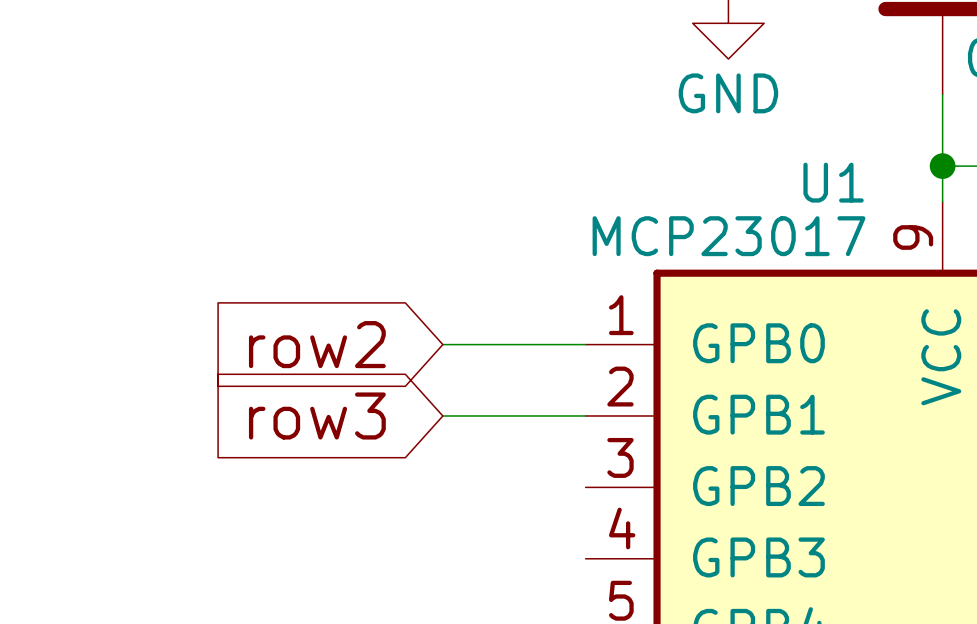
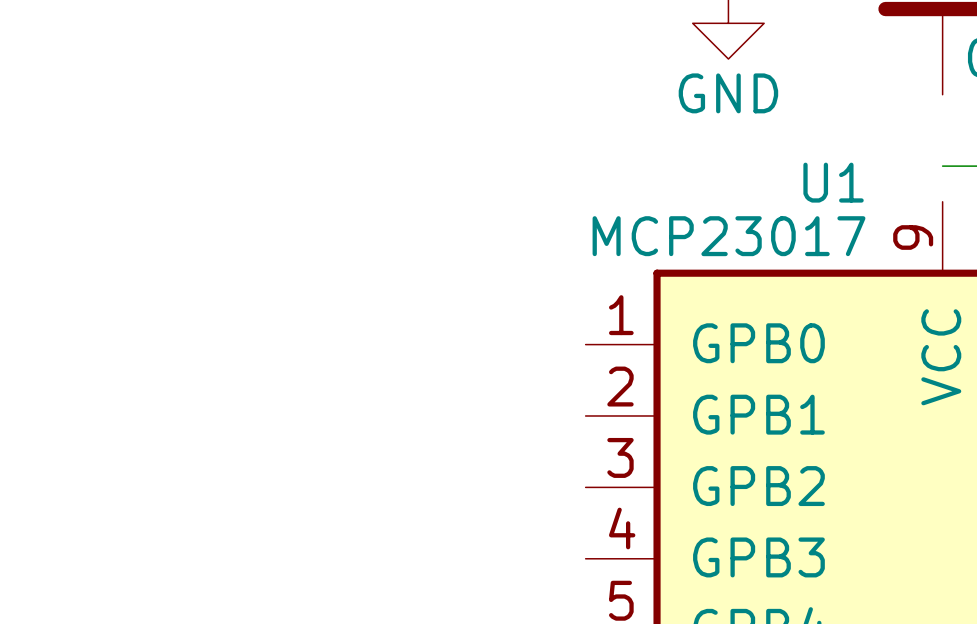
wire: (942, 94) (942, 201) -> none
junction: (942, 166) -> none
global label: row2 (317, 344) -> none
wire: (442, 344) (585, 344) -> none
global label: row3 (317, 415) -> none
wire: (442, 415) (585, 415) -> none

